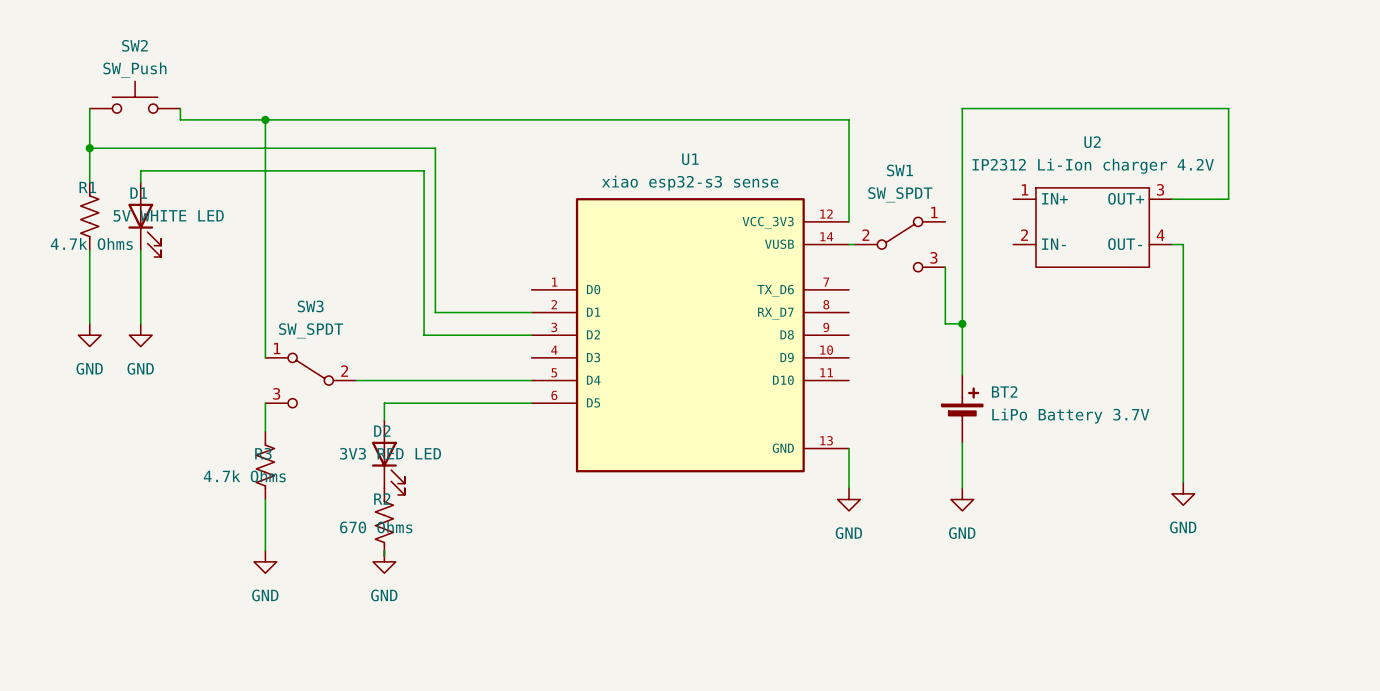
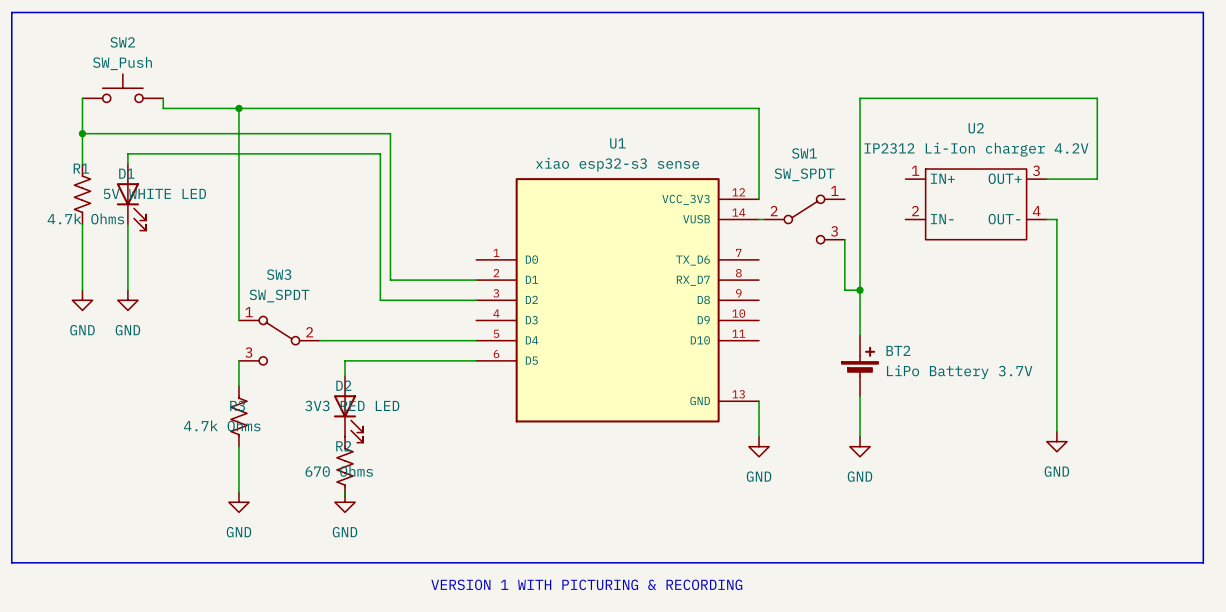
line: none -> (11, 12) (1203, 12) (1203, 562) (11, 562) (11, 12)
text: none -> VERSION 1 WITH PICTURING & RECORDING (586, 584)

